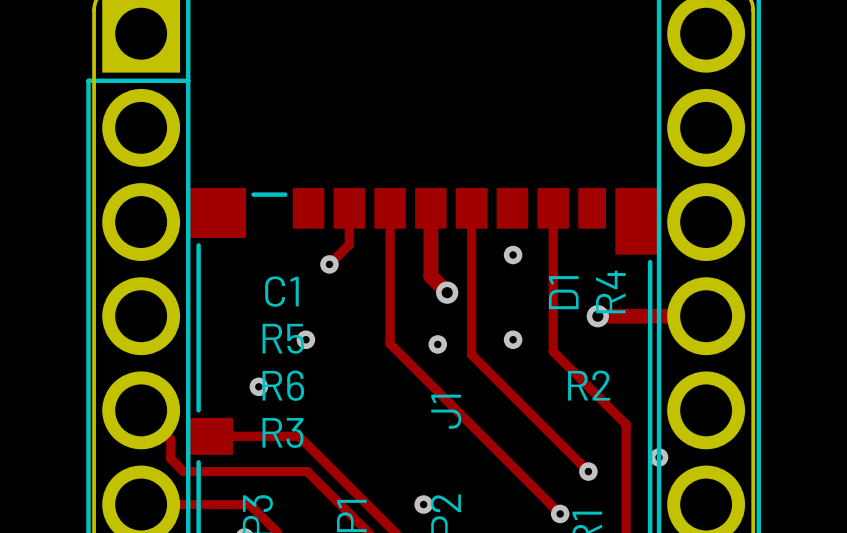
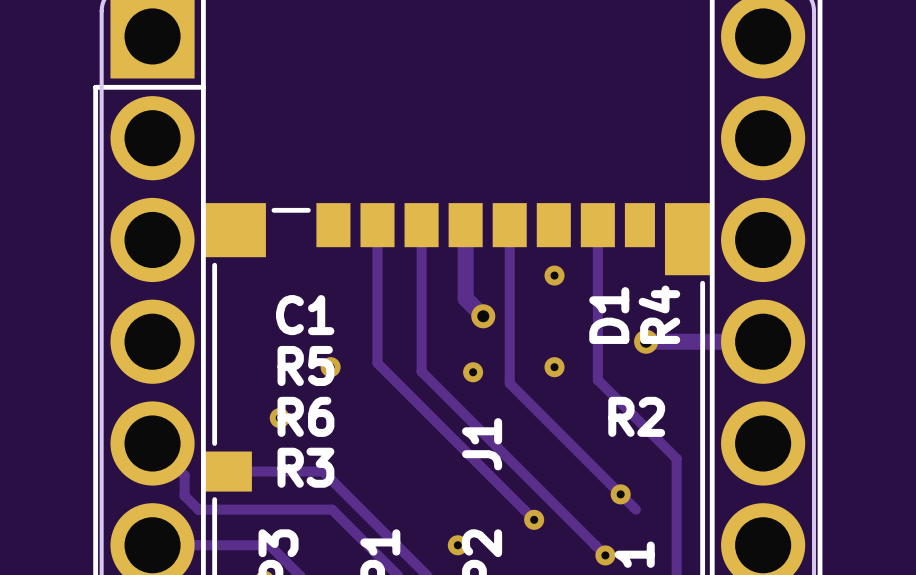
track: (349, 244) (329, 264) -> (377, 264) (377, 363) (534, 519)
via: (329, 264) -> none
via: (659, 457) -> none
via position: (588, 471) -> (620, 494)
via: none -> (534, 519)

